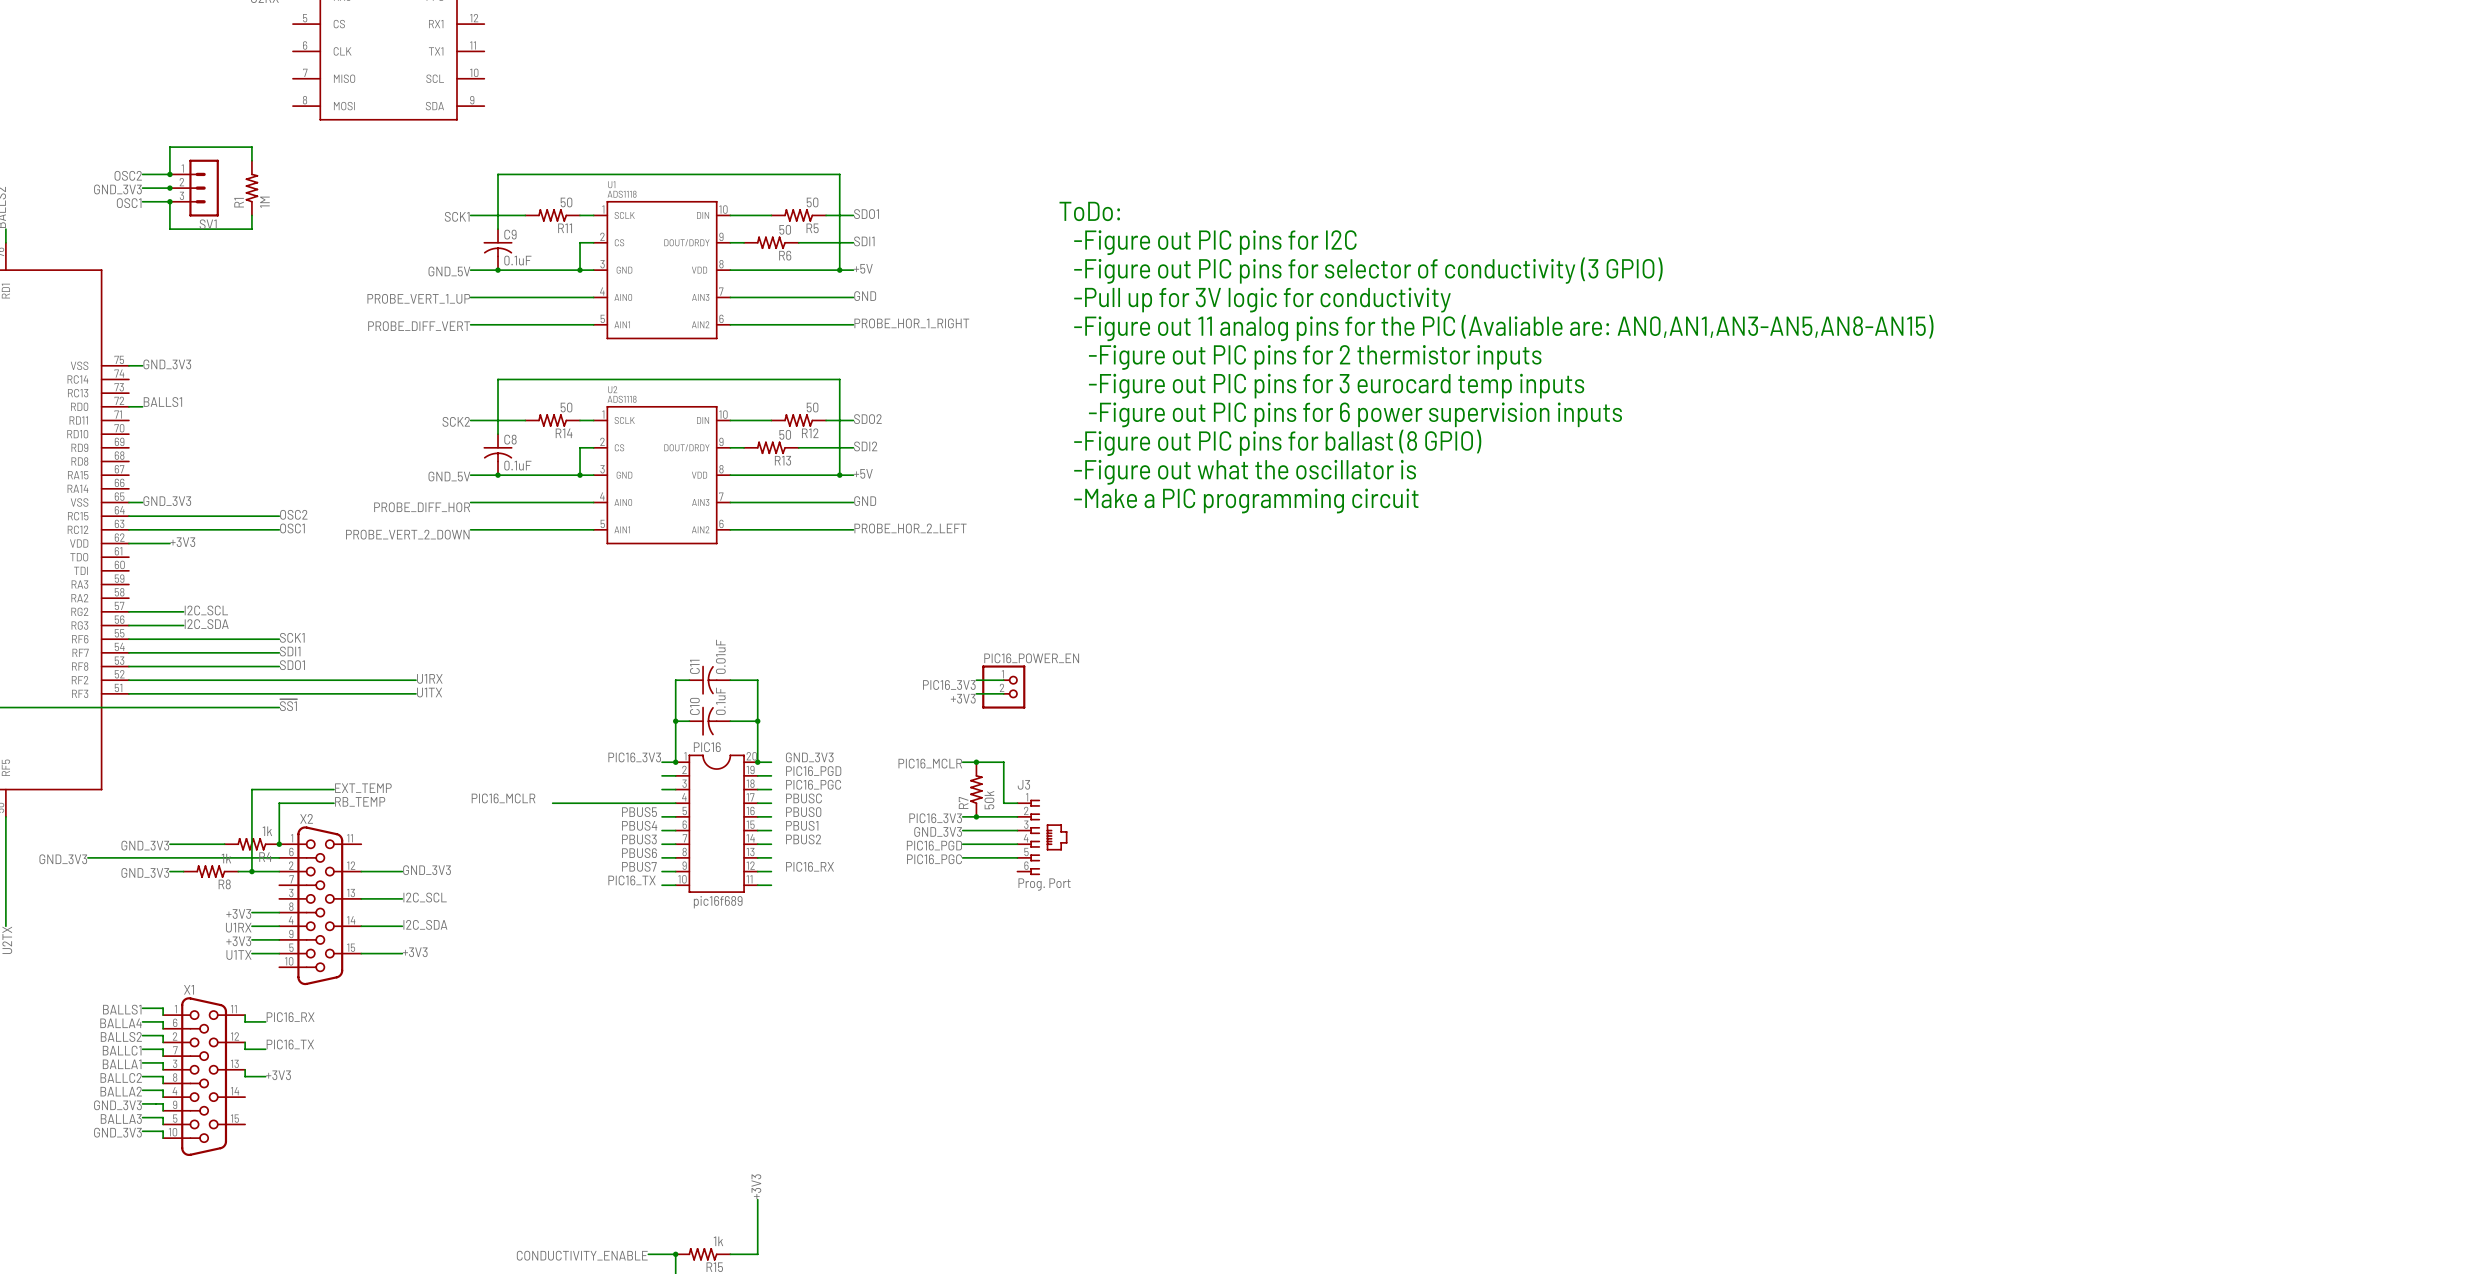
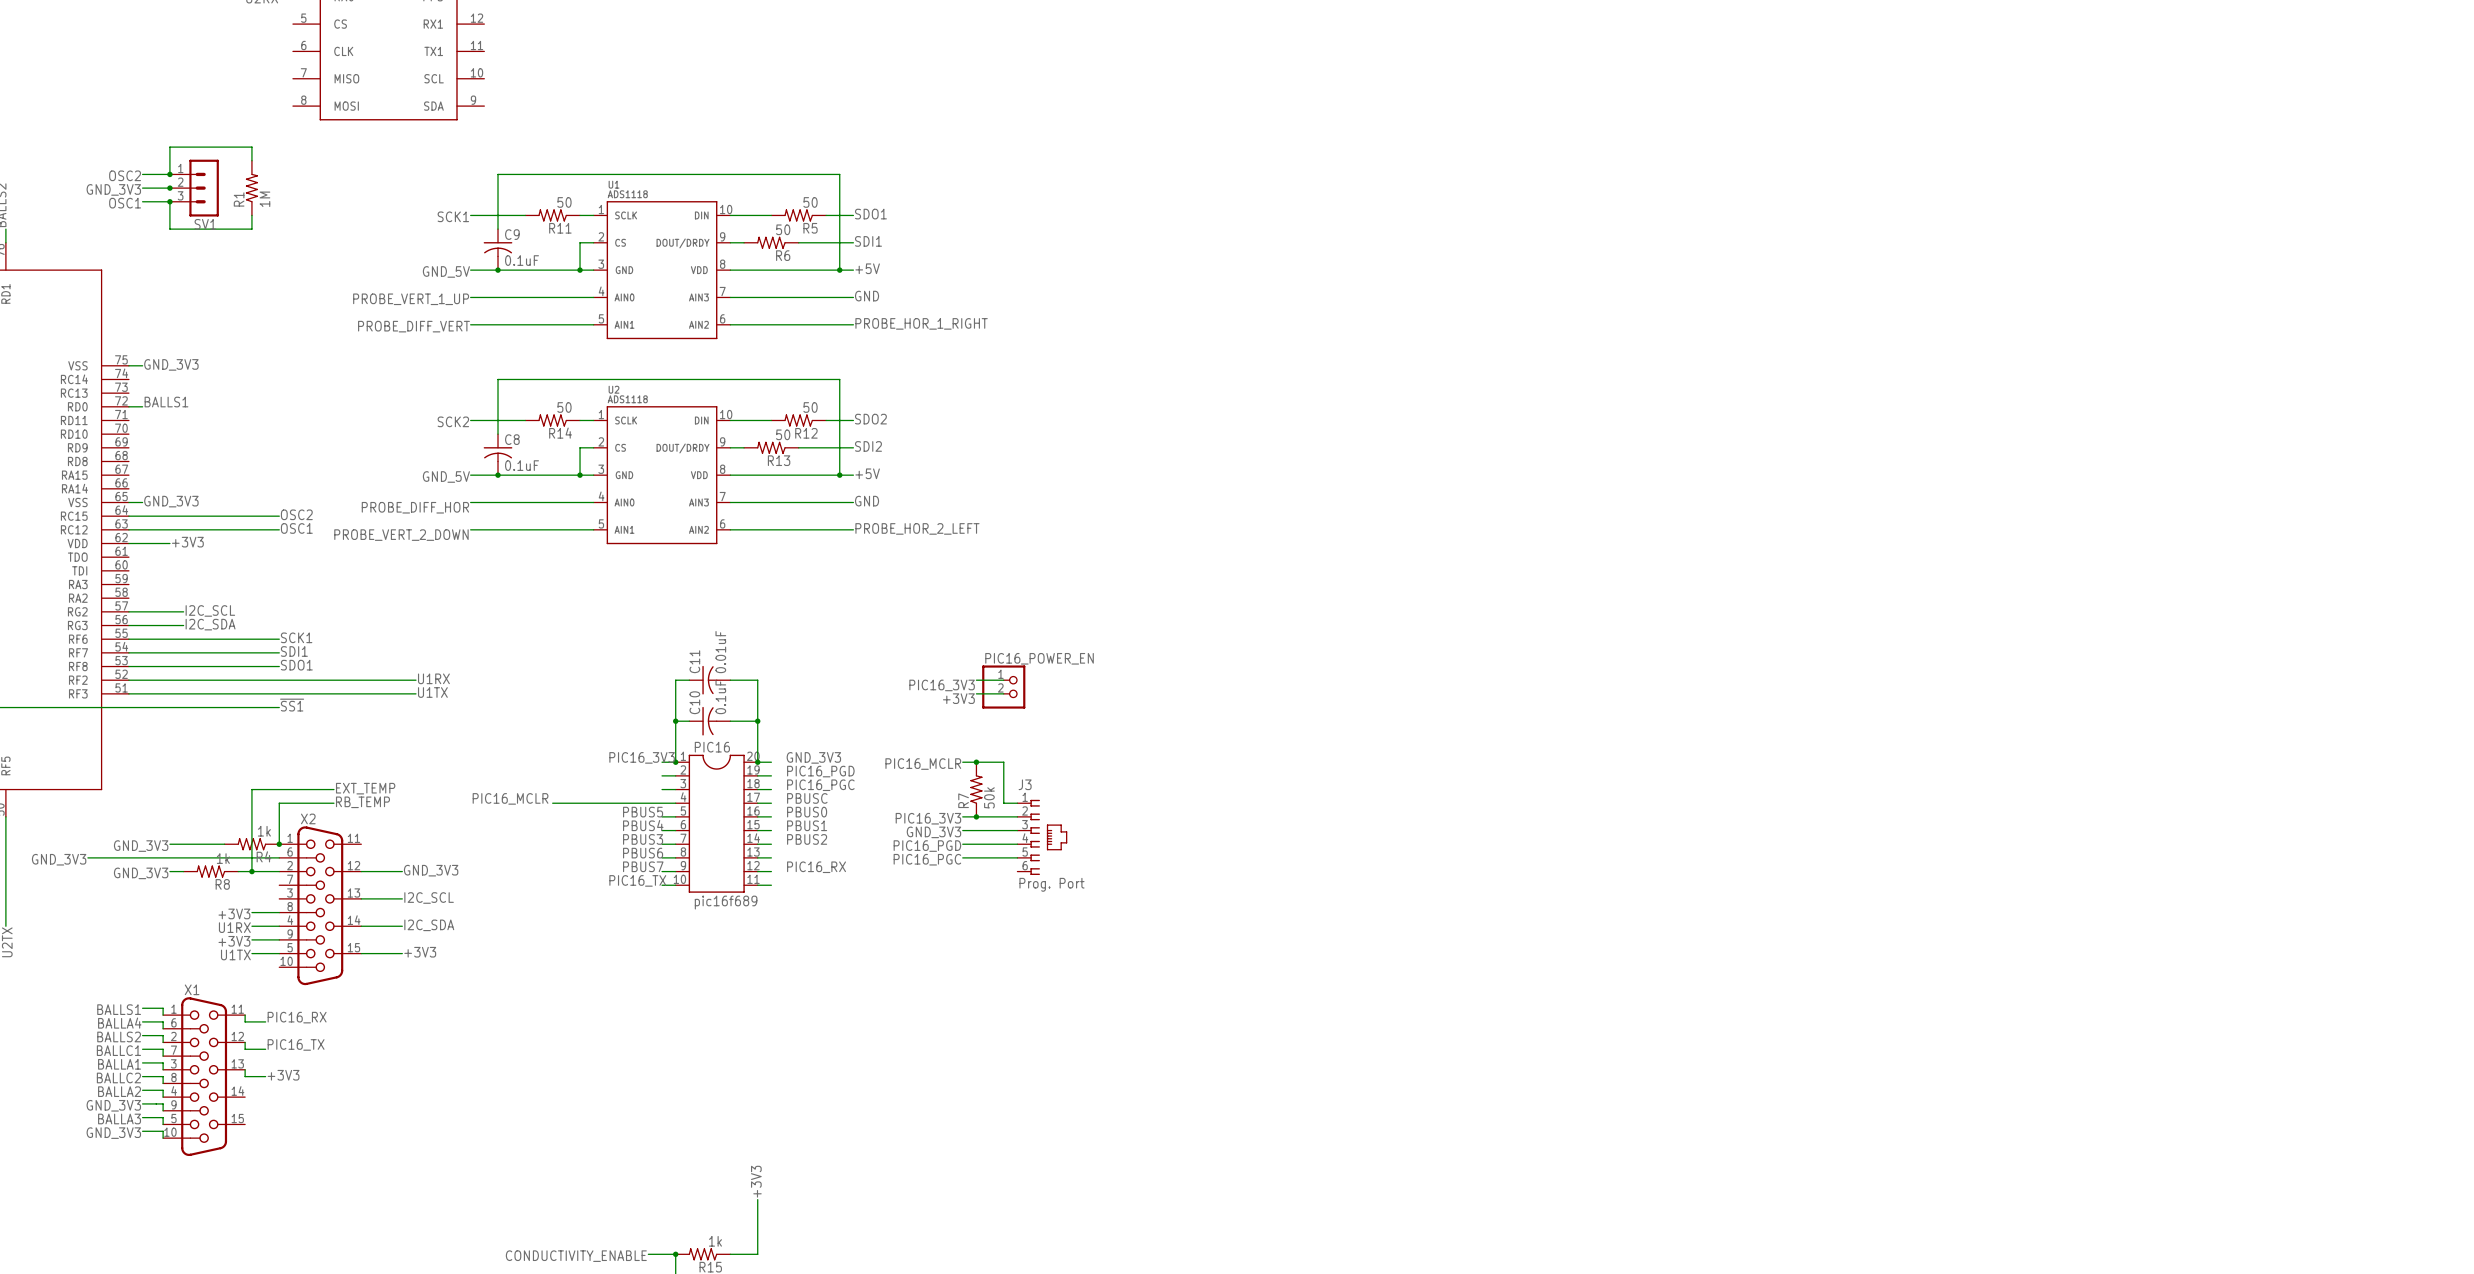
text: ToDo: (1089, 211) -> none
text: -Figure out PIC pins for I2C (1215, 242) -> none
text: -Figure out PIC pins for selector of conductivity (3 GPIO) (1368, 270) -> none
text: -Pull up for 3V logic for conductivity (1262, 300) -> none
text: -Figure out 11 analog pins for the PIC (Avaliable are: AN0,AN1,AN3-AN5,AN8-AN15) (1503, 328) -> none
text: -Figure out PIC pins for 2 thermistor inputs (1315, 357) -> none
text: -Figure out PIC pins for 3 eurocard temp inputs (1336, 386) -> none
text: -Figure out PIC pins for 6 power supervision inputs (1355, 414) -> none
text: -Figure out PIC pins for ballast (8 GPIO) (1277, 442) -> none
text: -Figure out what the oscillator is (1245, 472) -> none
text: -Make a PIC programming circuit (1246, 500) -> none

